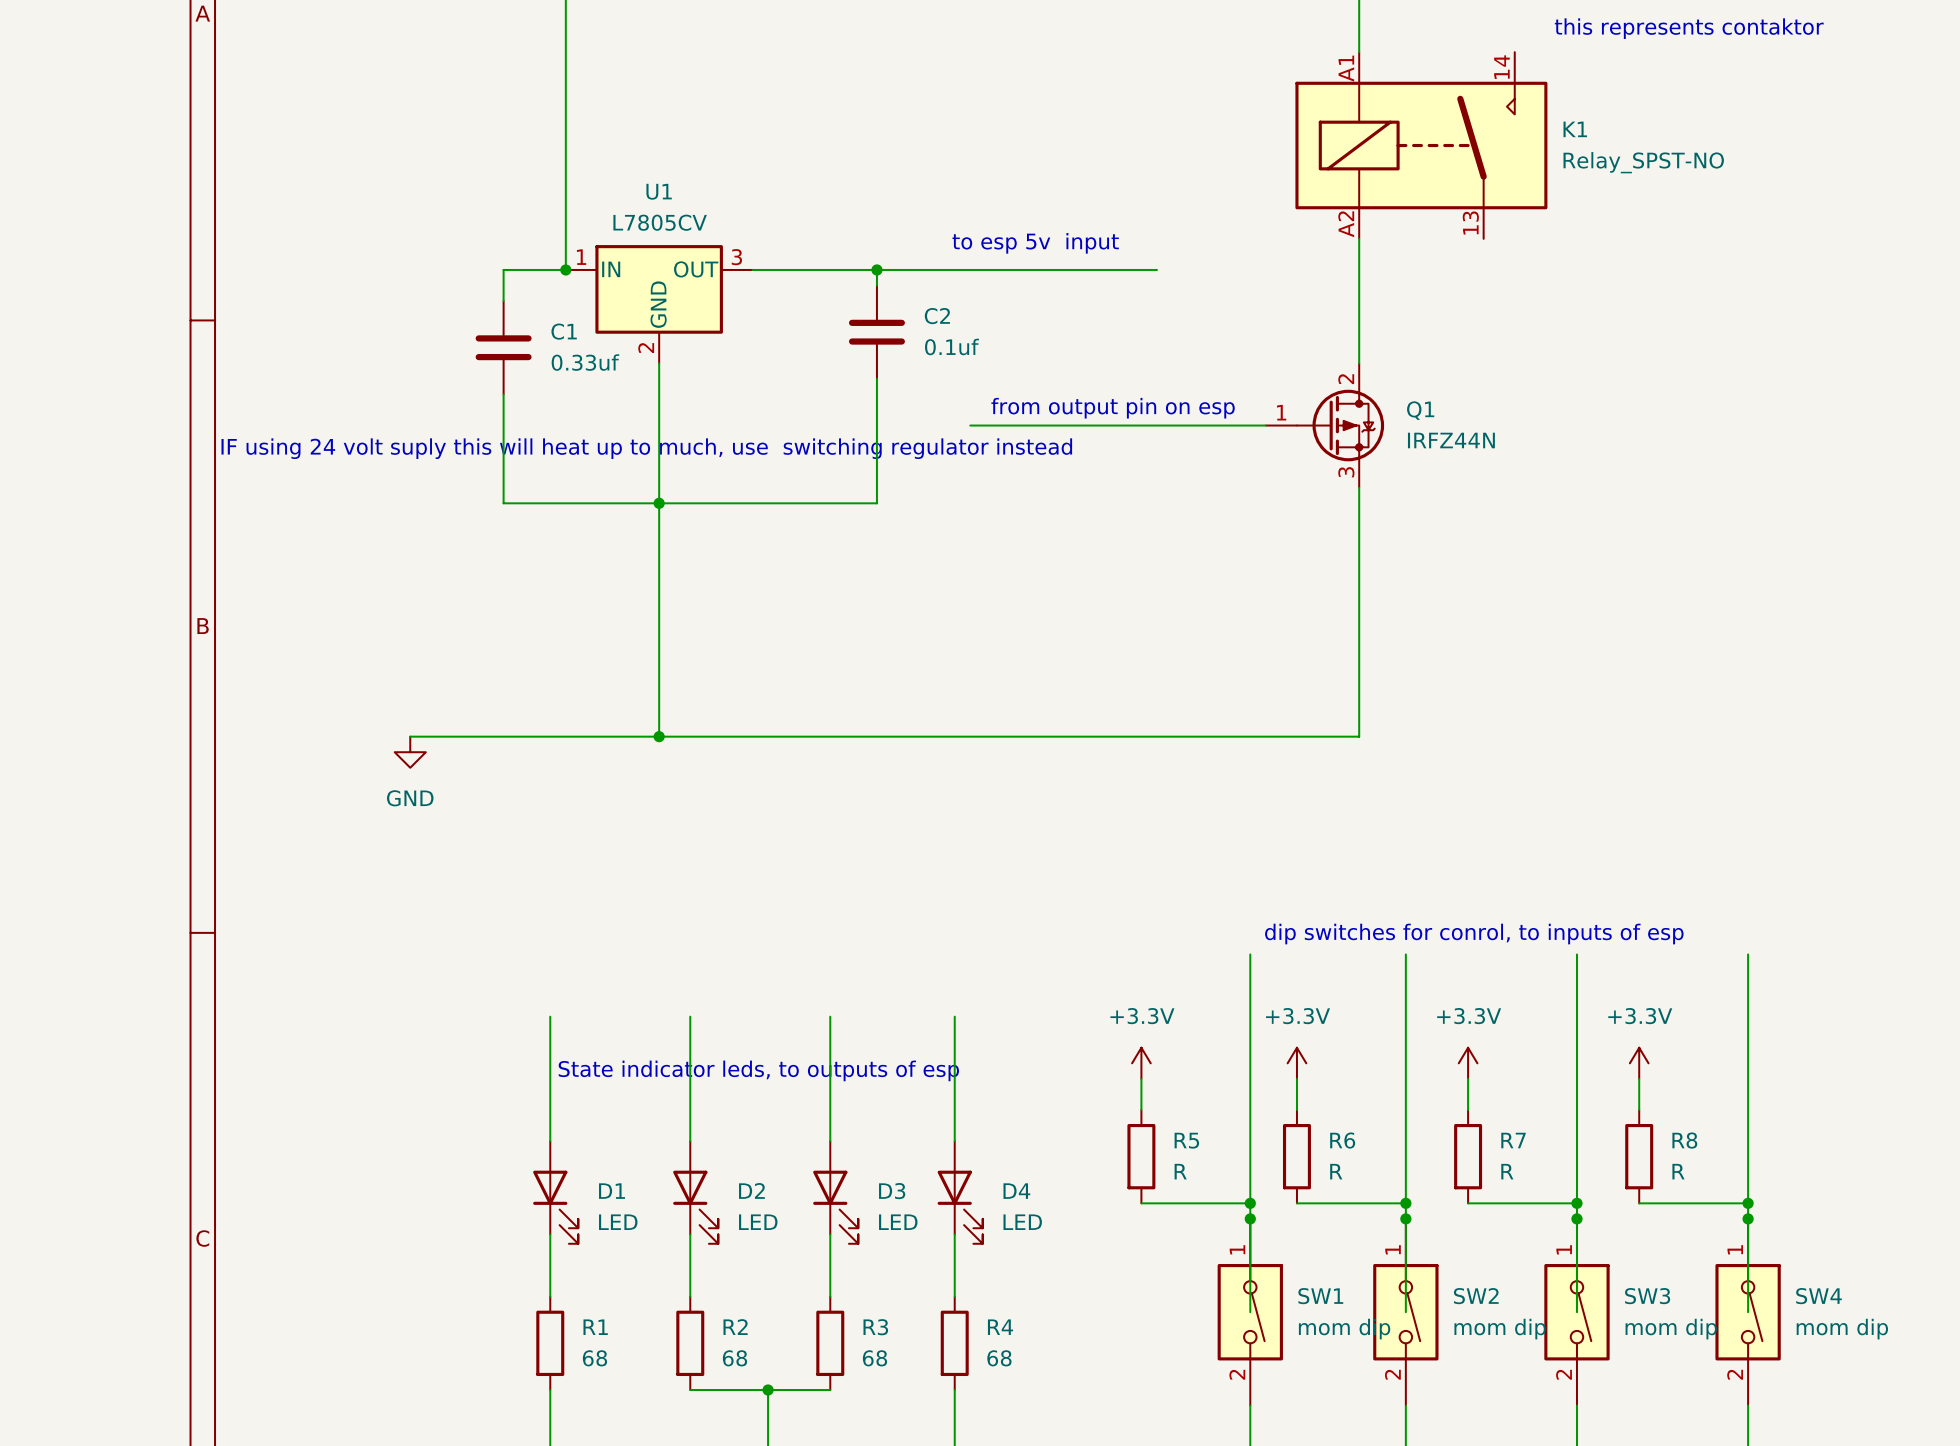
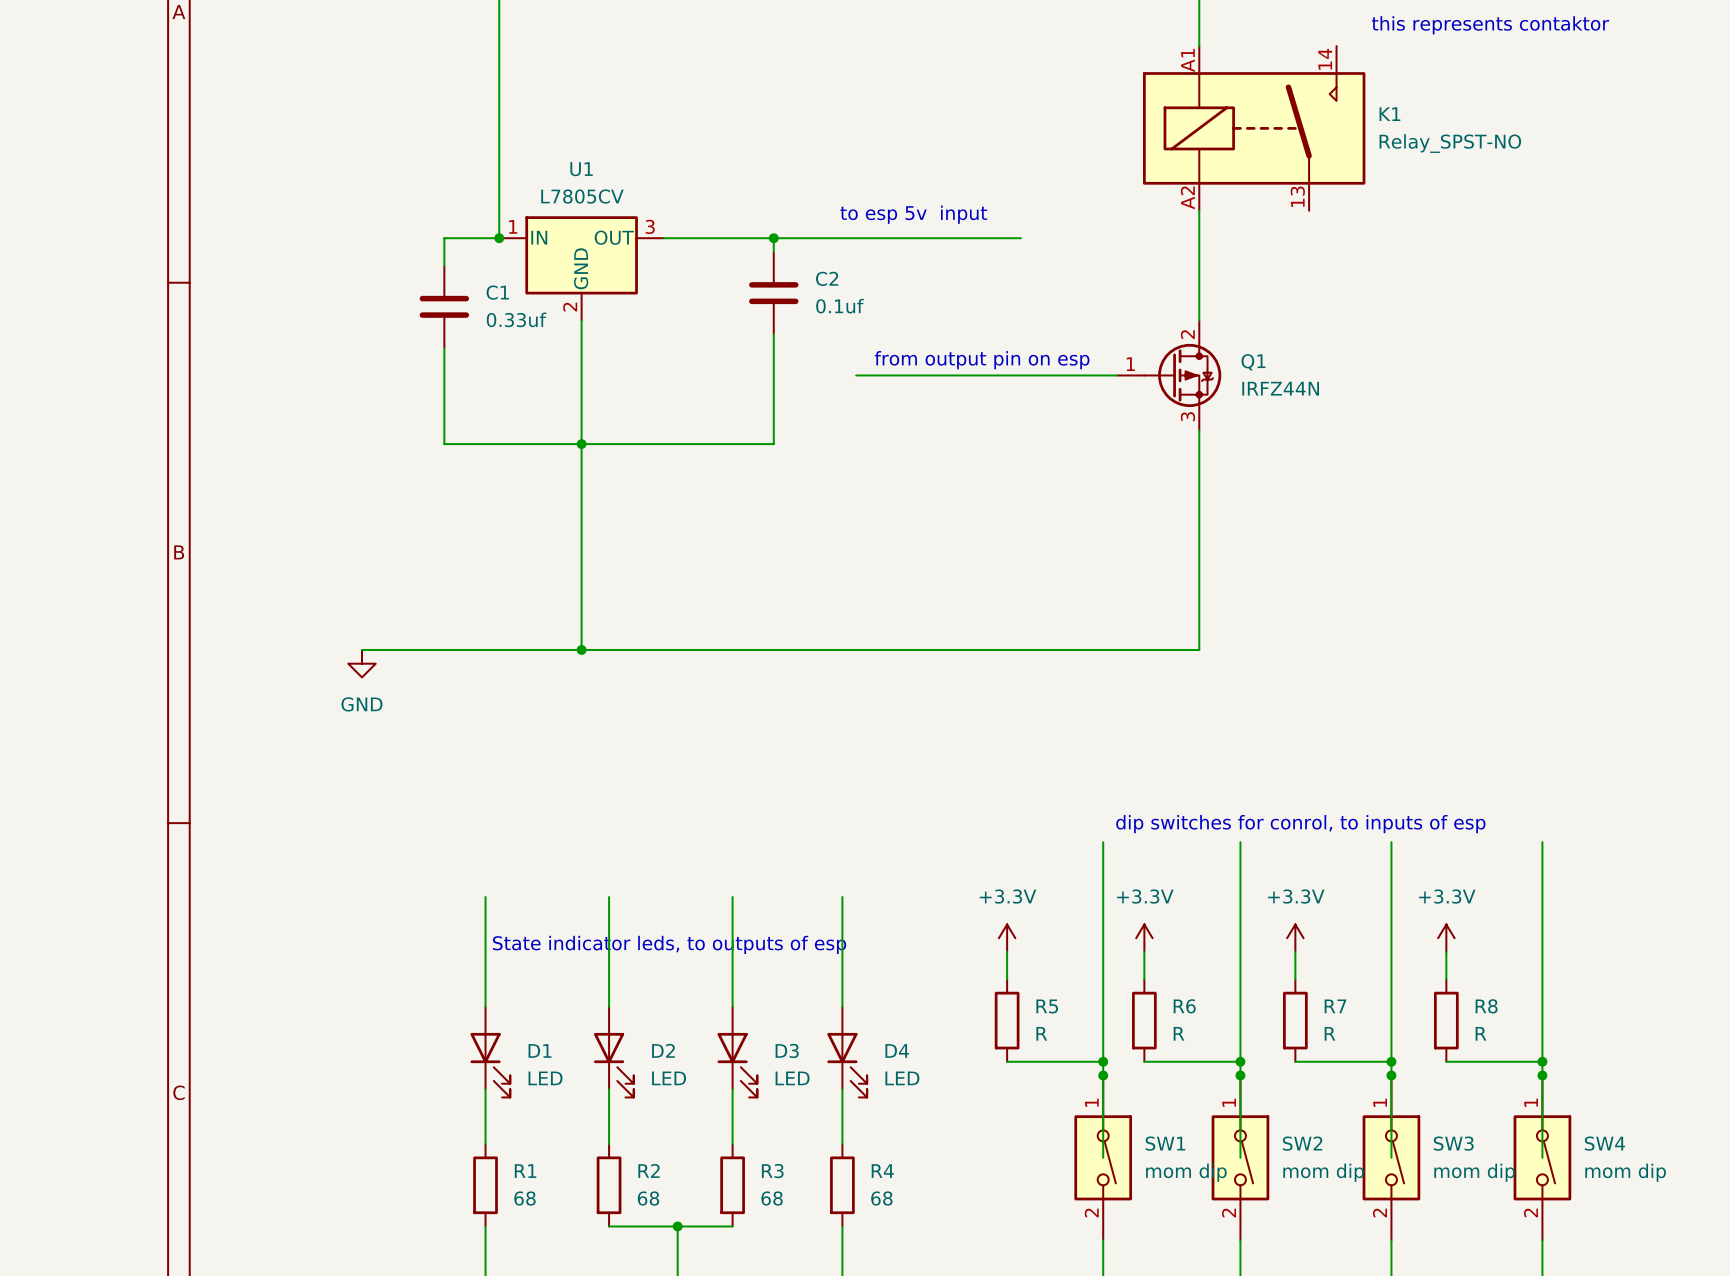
text: IF using 24 volt suply this will heat up to much, use switching regulator instead (646, 448) -> none

